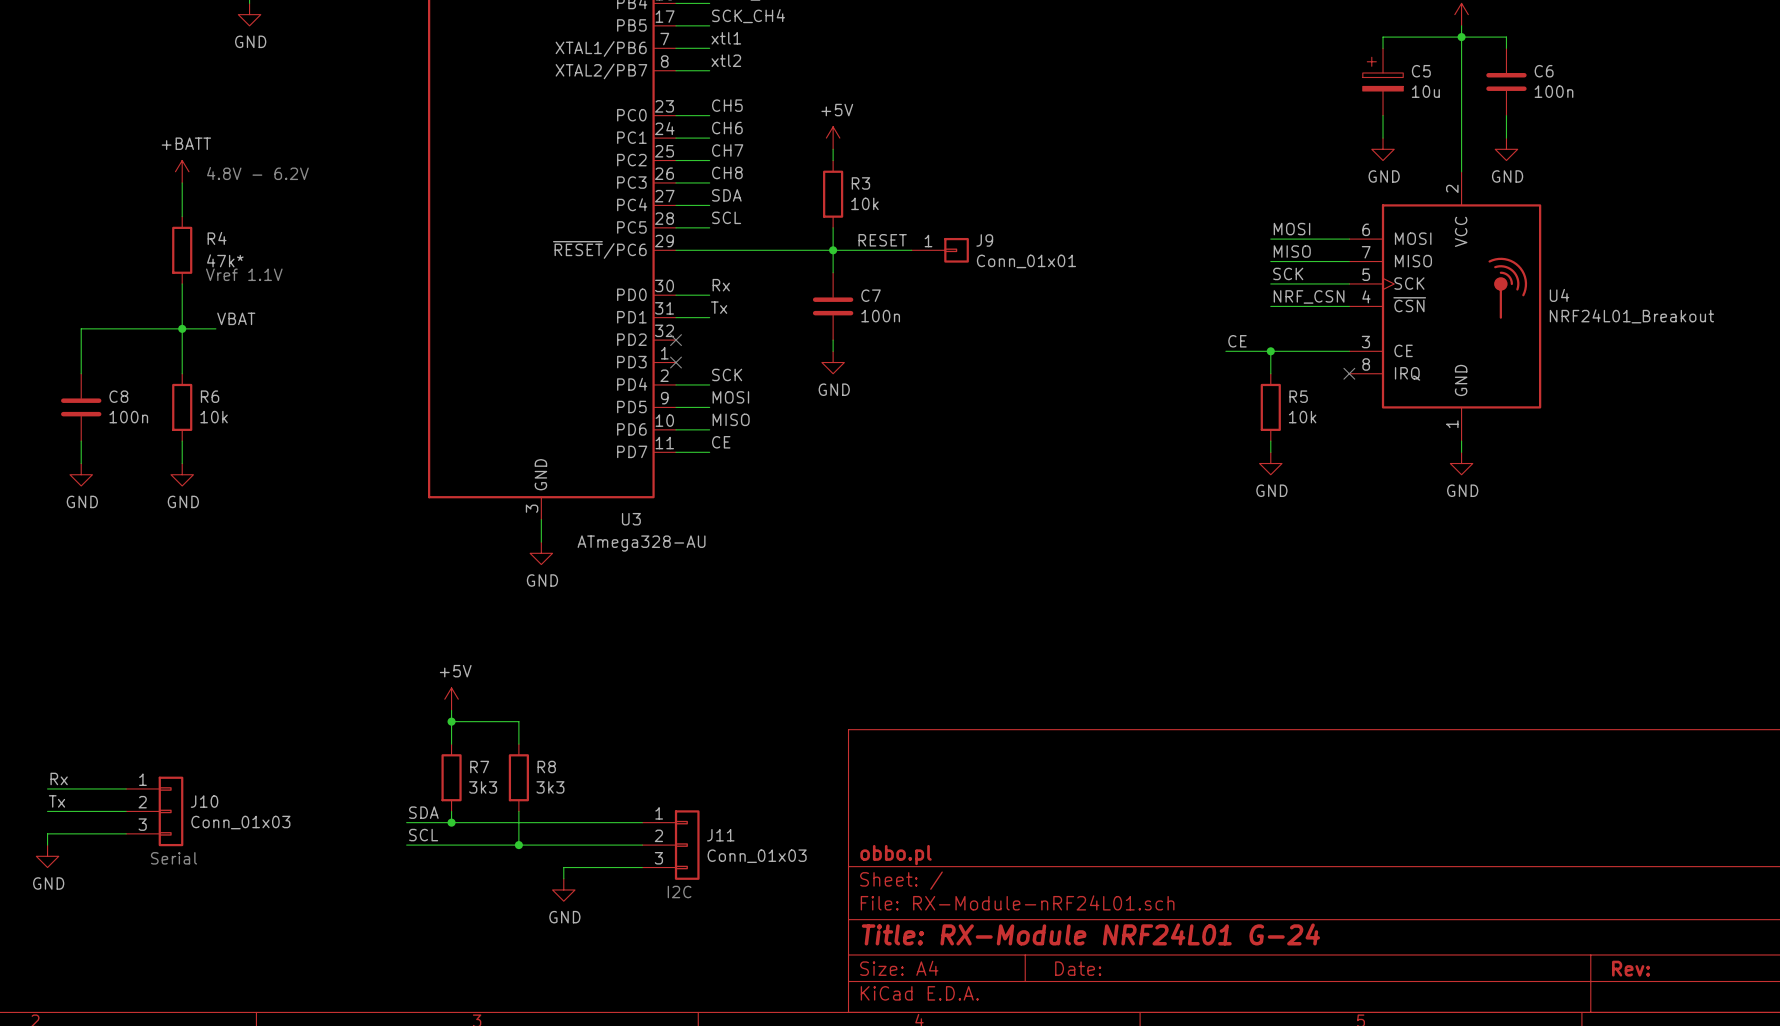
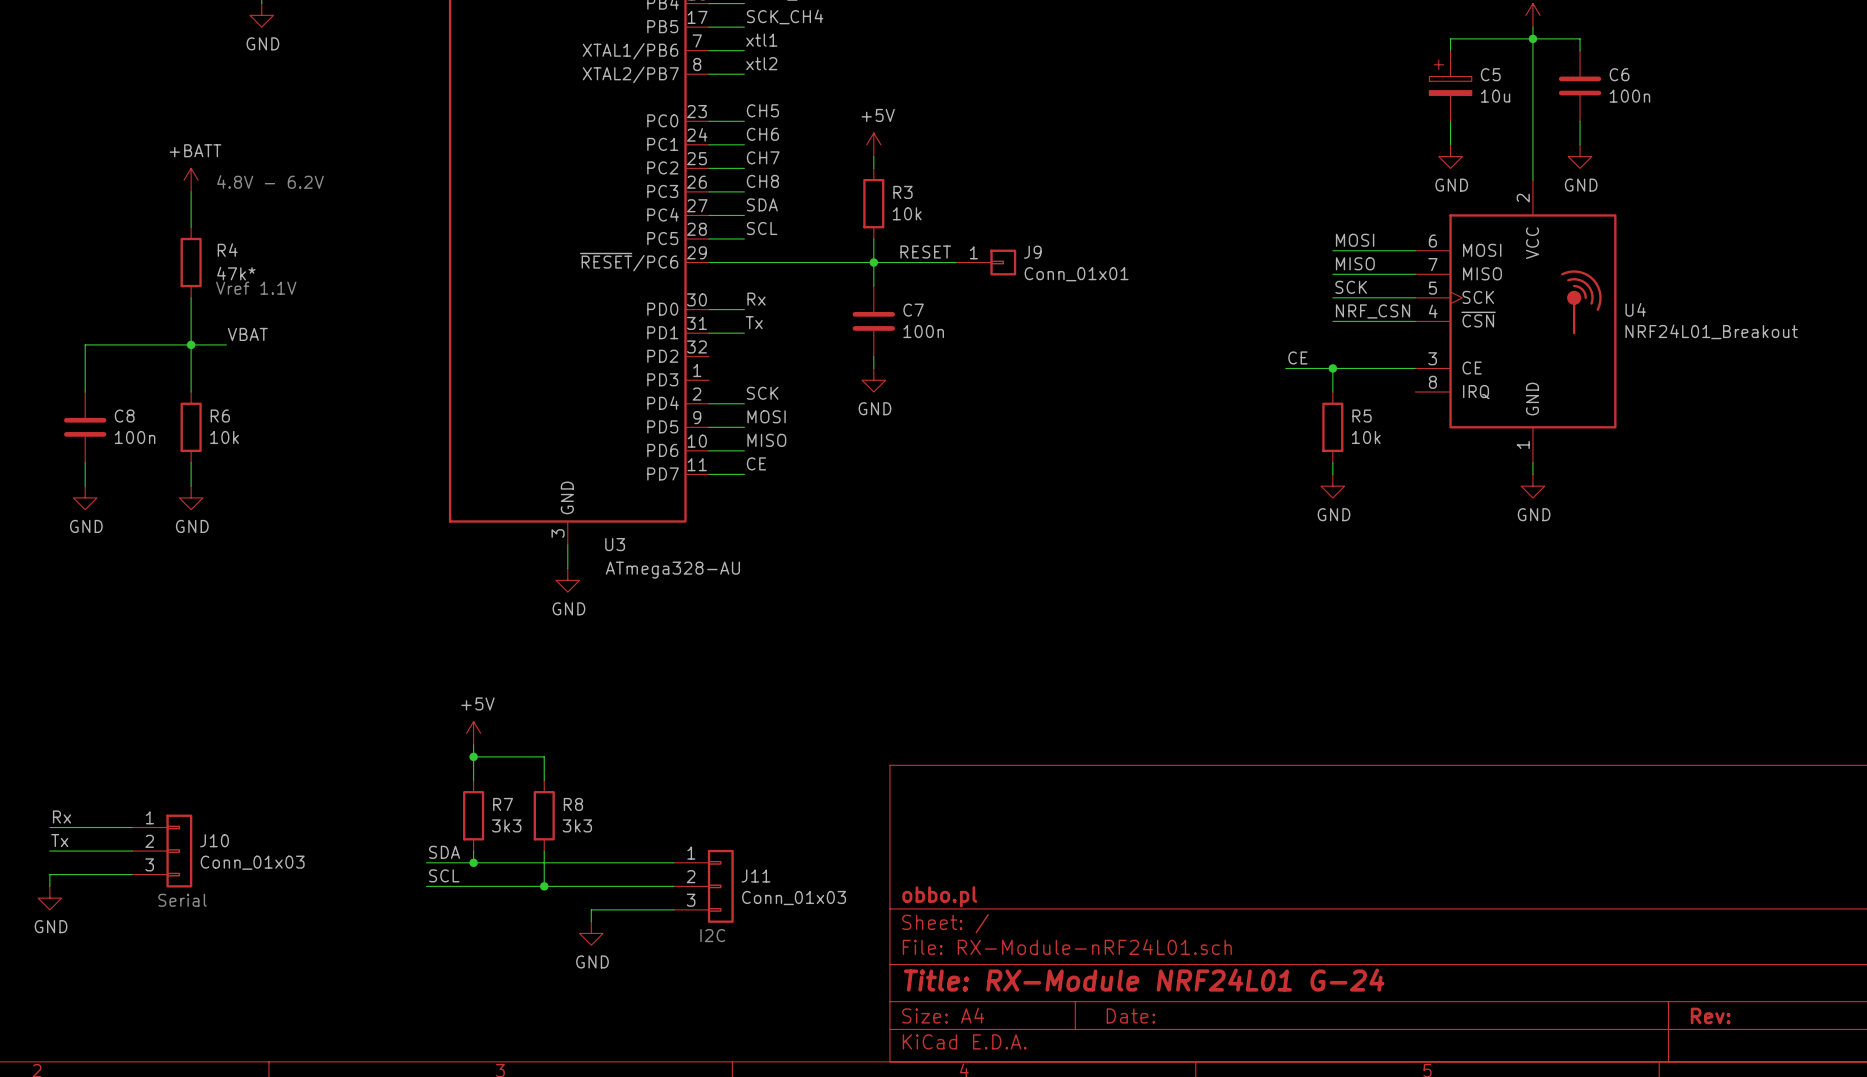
no-connect mark: (676, 340) -> none
no-connect mark: (676, 362) -> none
no-connect mark: (1349, 373) -> none
U3 name position: U3 (631, 519) -> U3 (615, 544)

